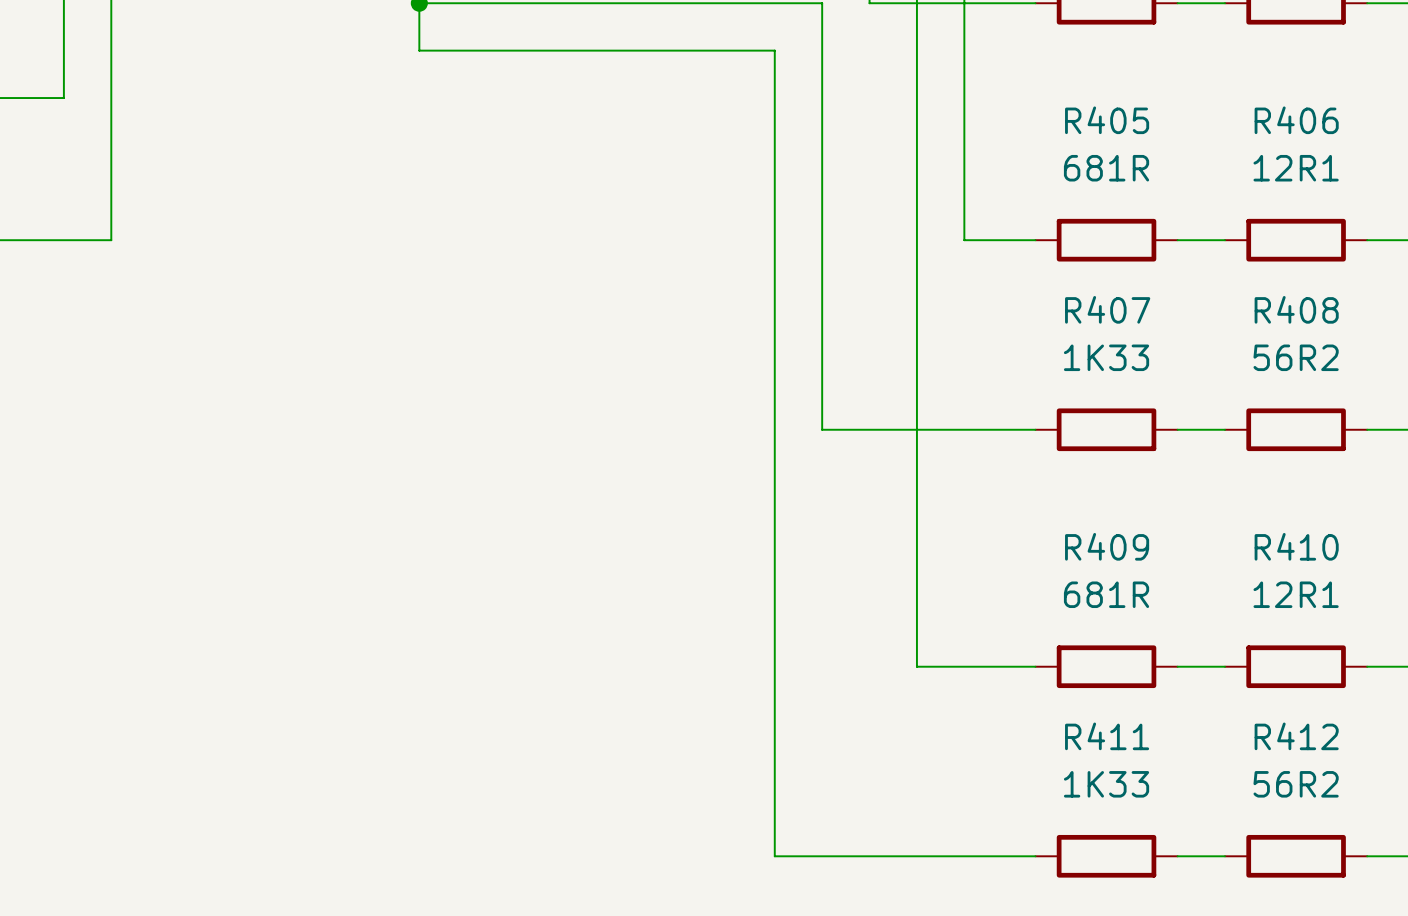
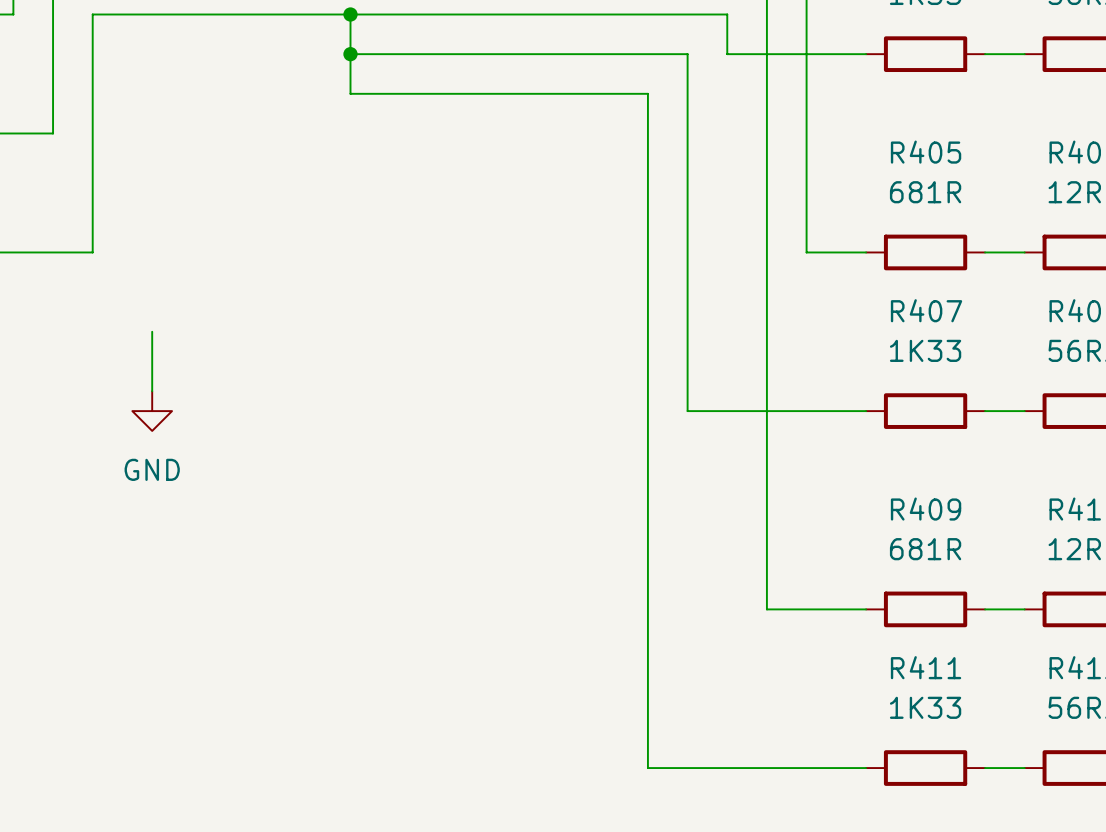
wire: none -> (152, 331) (152, 391)
power symbol: none -> GND (152, 411)

